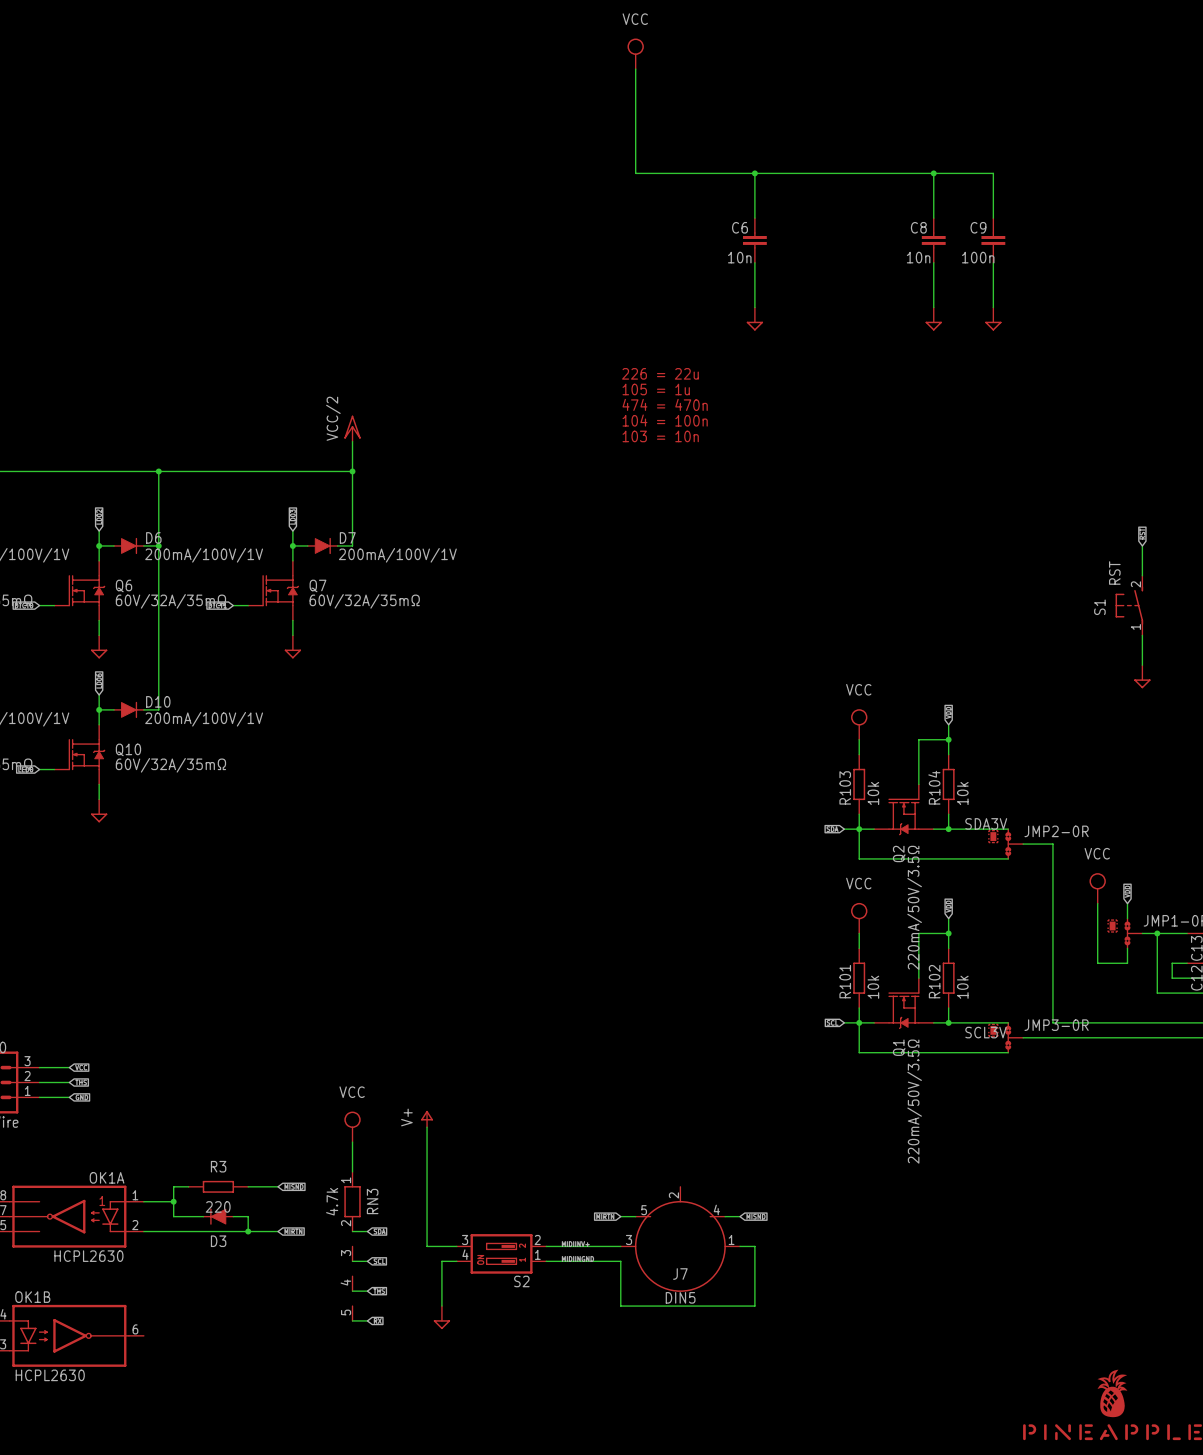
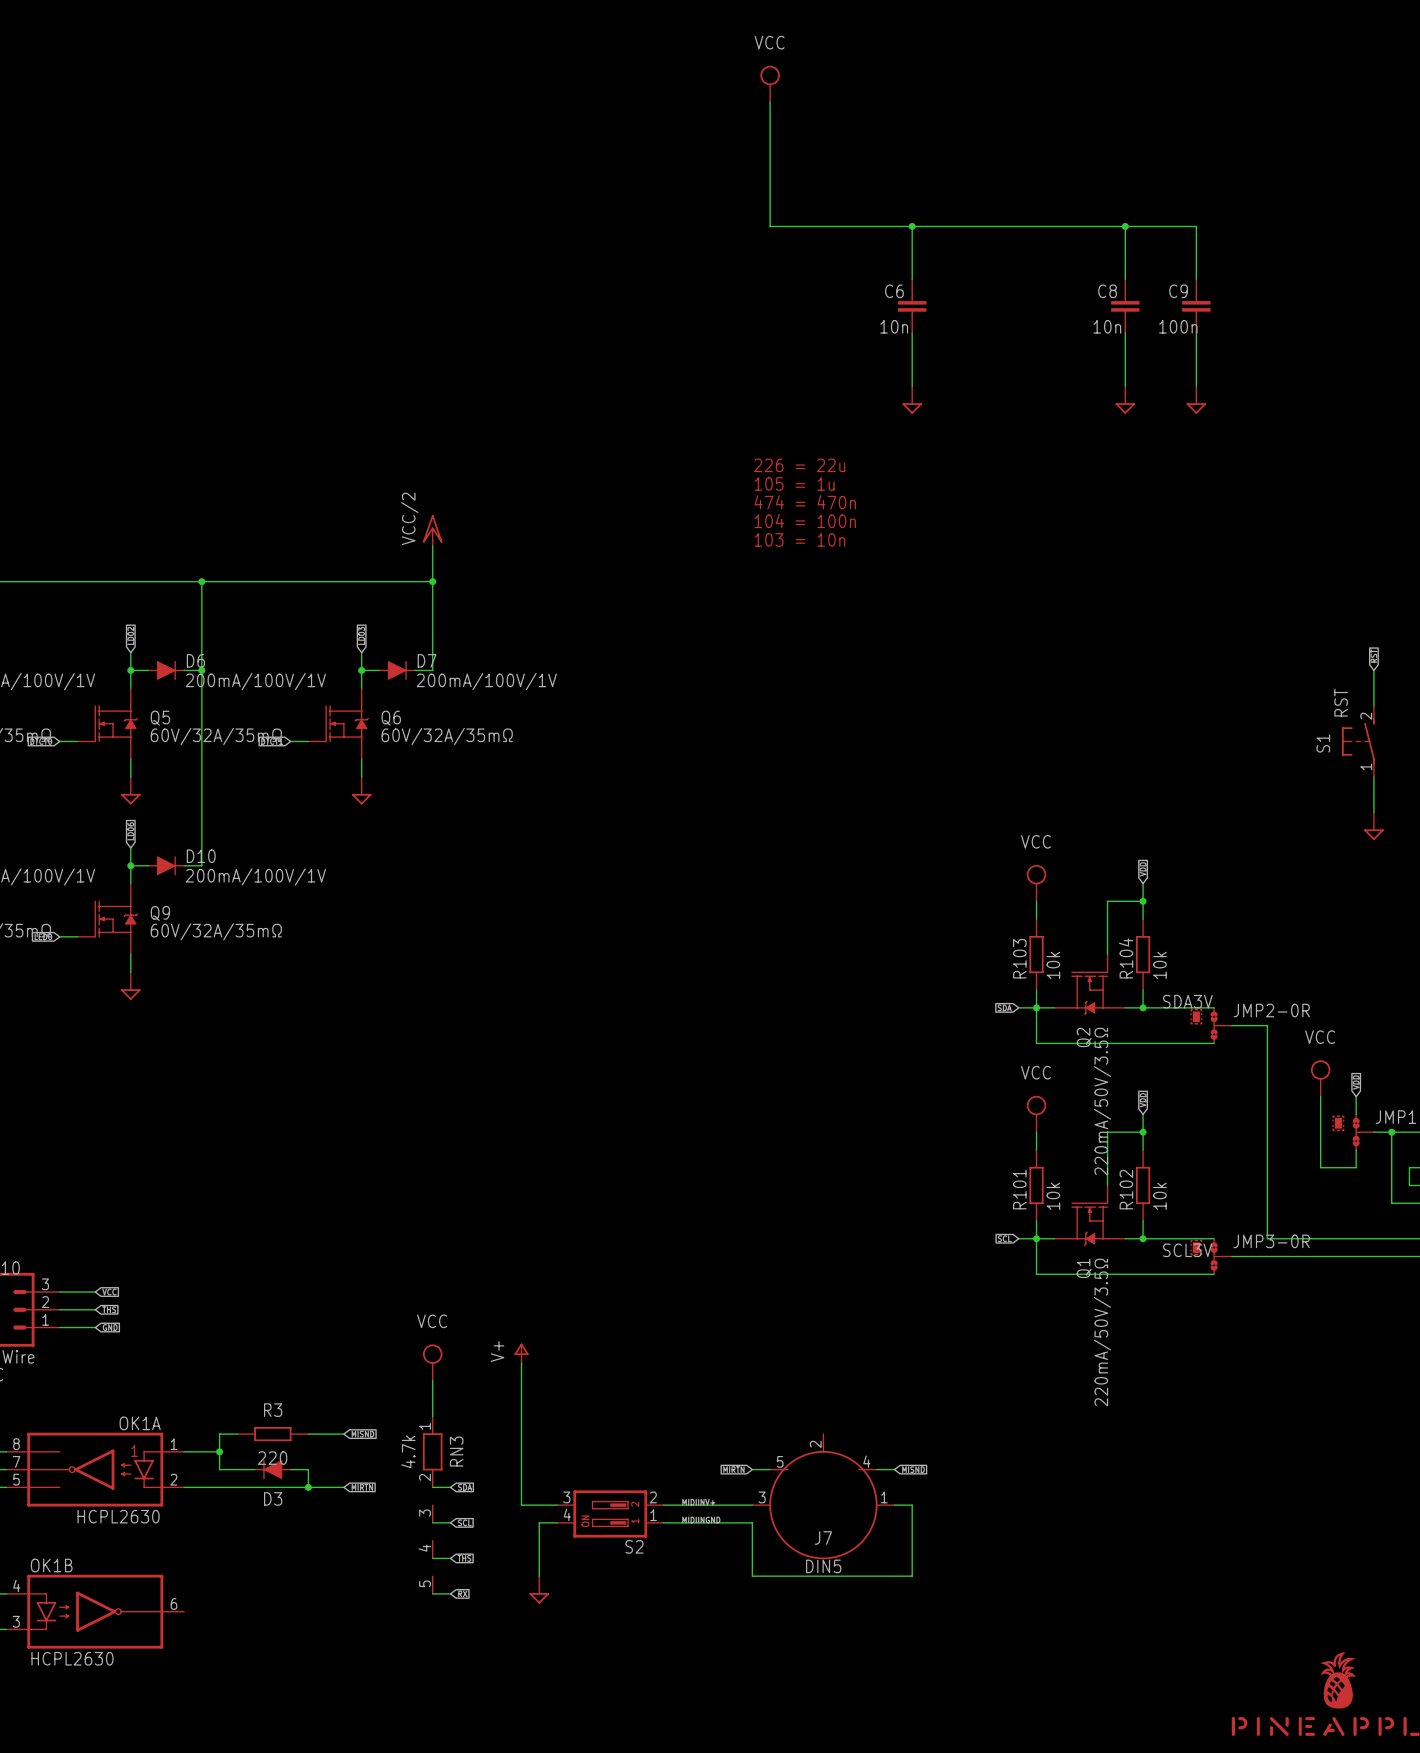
Q6 name: Q6 (124, 585) -> Q5 (160, 718)
Q7 name: Q7 (317, 585) -> Q6 (391, 718)
Q10 name: Q10 (128, 749) -> Q9 (160, 913)

